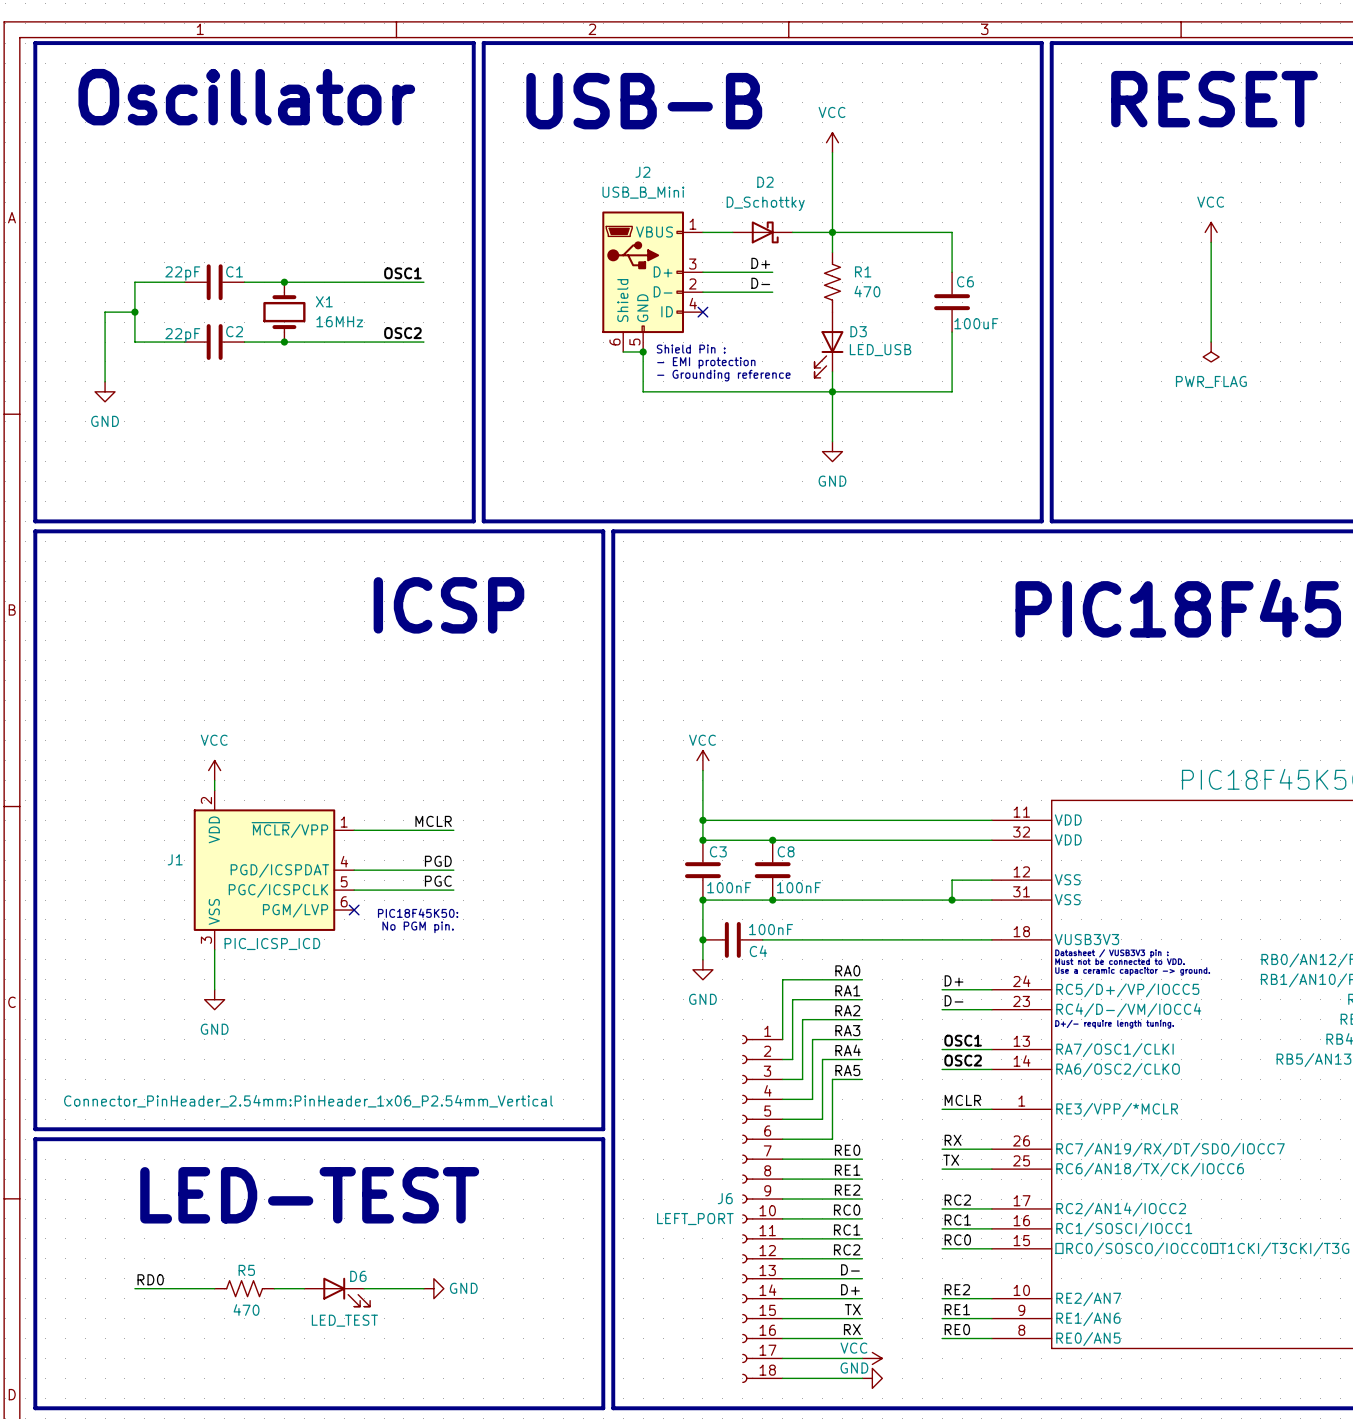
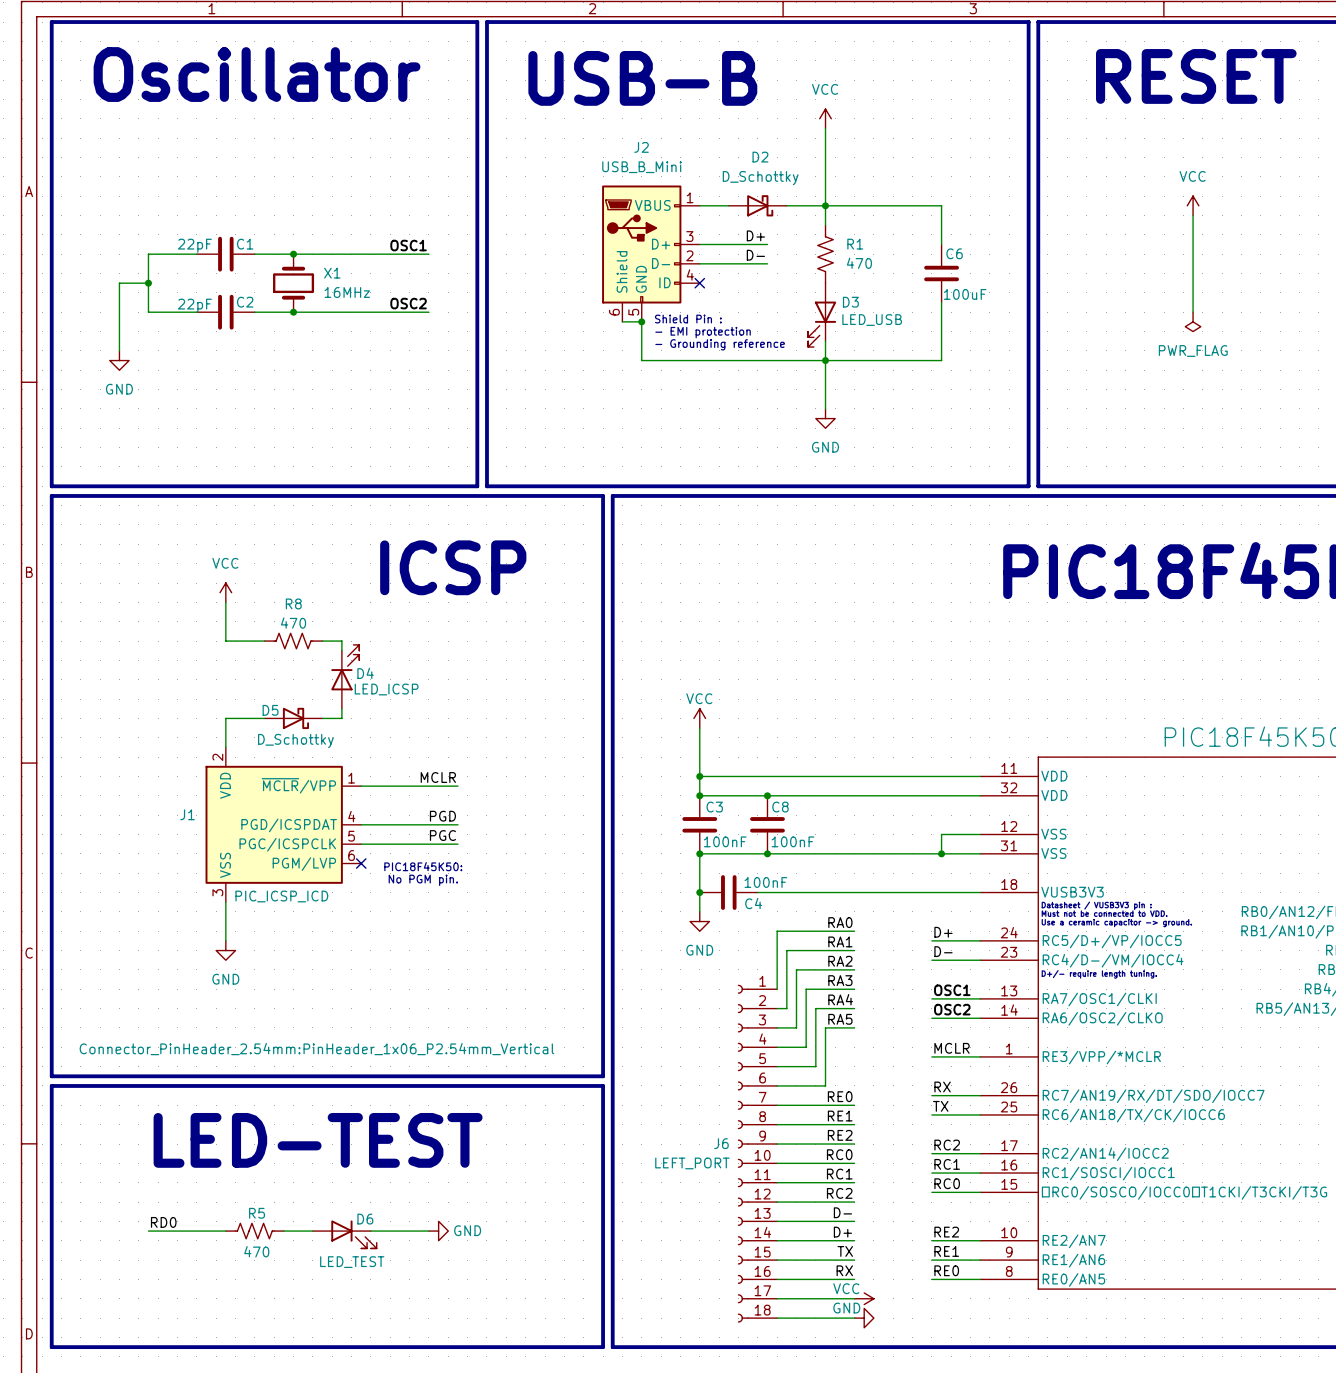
wire: none -> (225, 602) (225, 641) (264, 641)
R8: none -> 470 (293, 641)
wire: none -> (322, 641) (341, 641) (341, 650)
D4: none -> LED_ICSP (345, 676)
wire: none -> (341, 708) (341, 718) (322, 718)
wire: none -> (264, 718) (225, 718) (225, 737)
D5: none -> D_Schottky (293, 718)
power symbol position: VCC (214, 770) -> VCC (225, 592)

